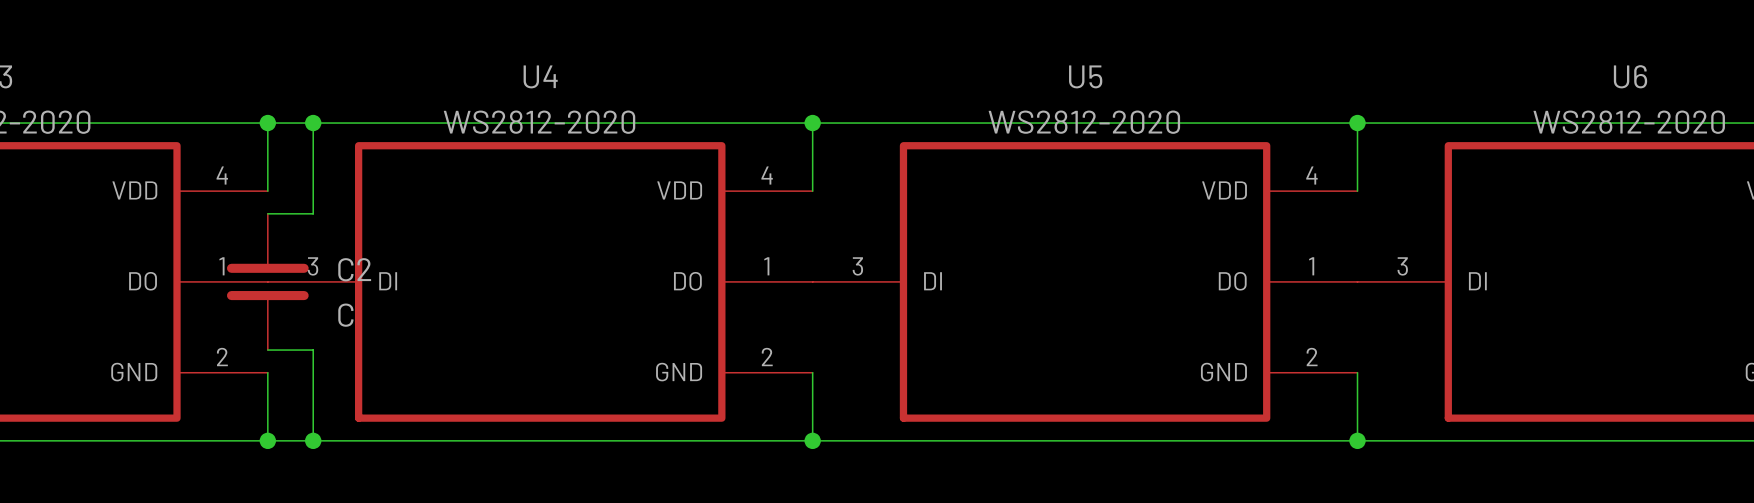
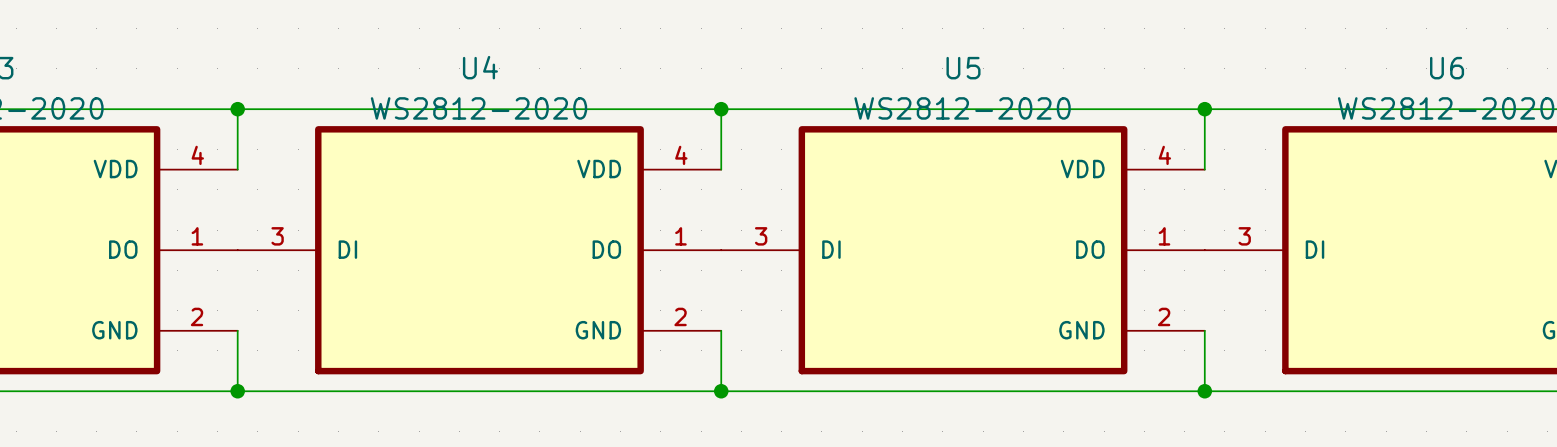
wire: (313, 123) (313, 213) (267, 213) -> none
junction: (313, 123) -> none
C2: C (267, 281) -> none
wire: (267, 350) (313, 350) (313, 440) -> none
junction: (313, 440) -> none

